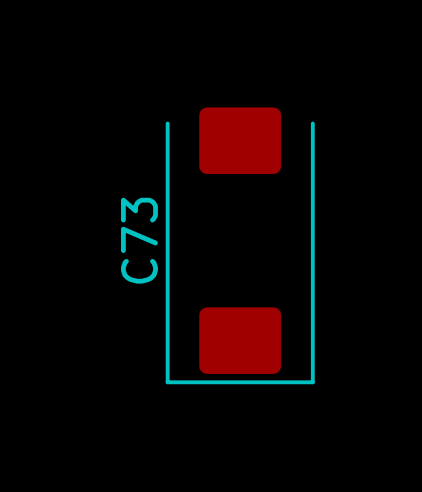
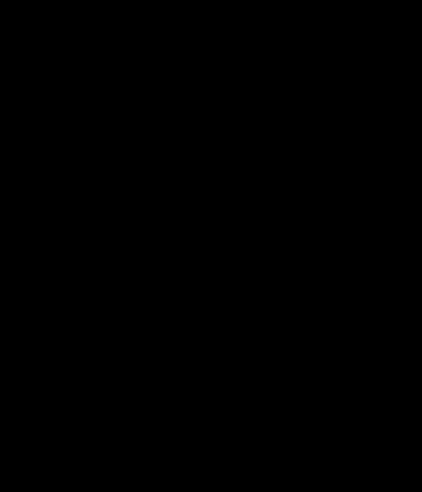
C73: (240, 245) -> none

